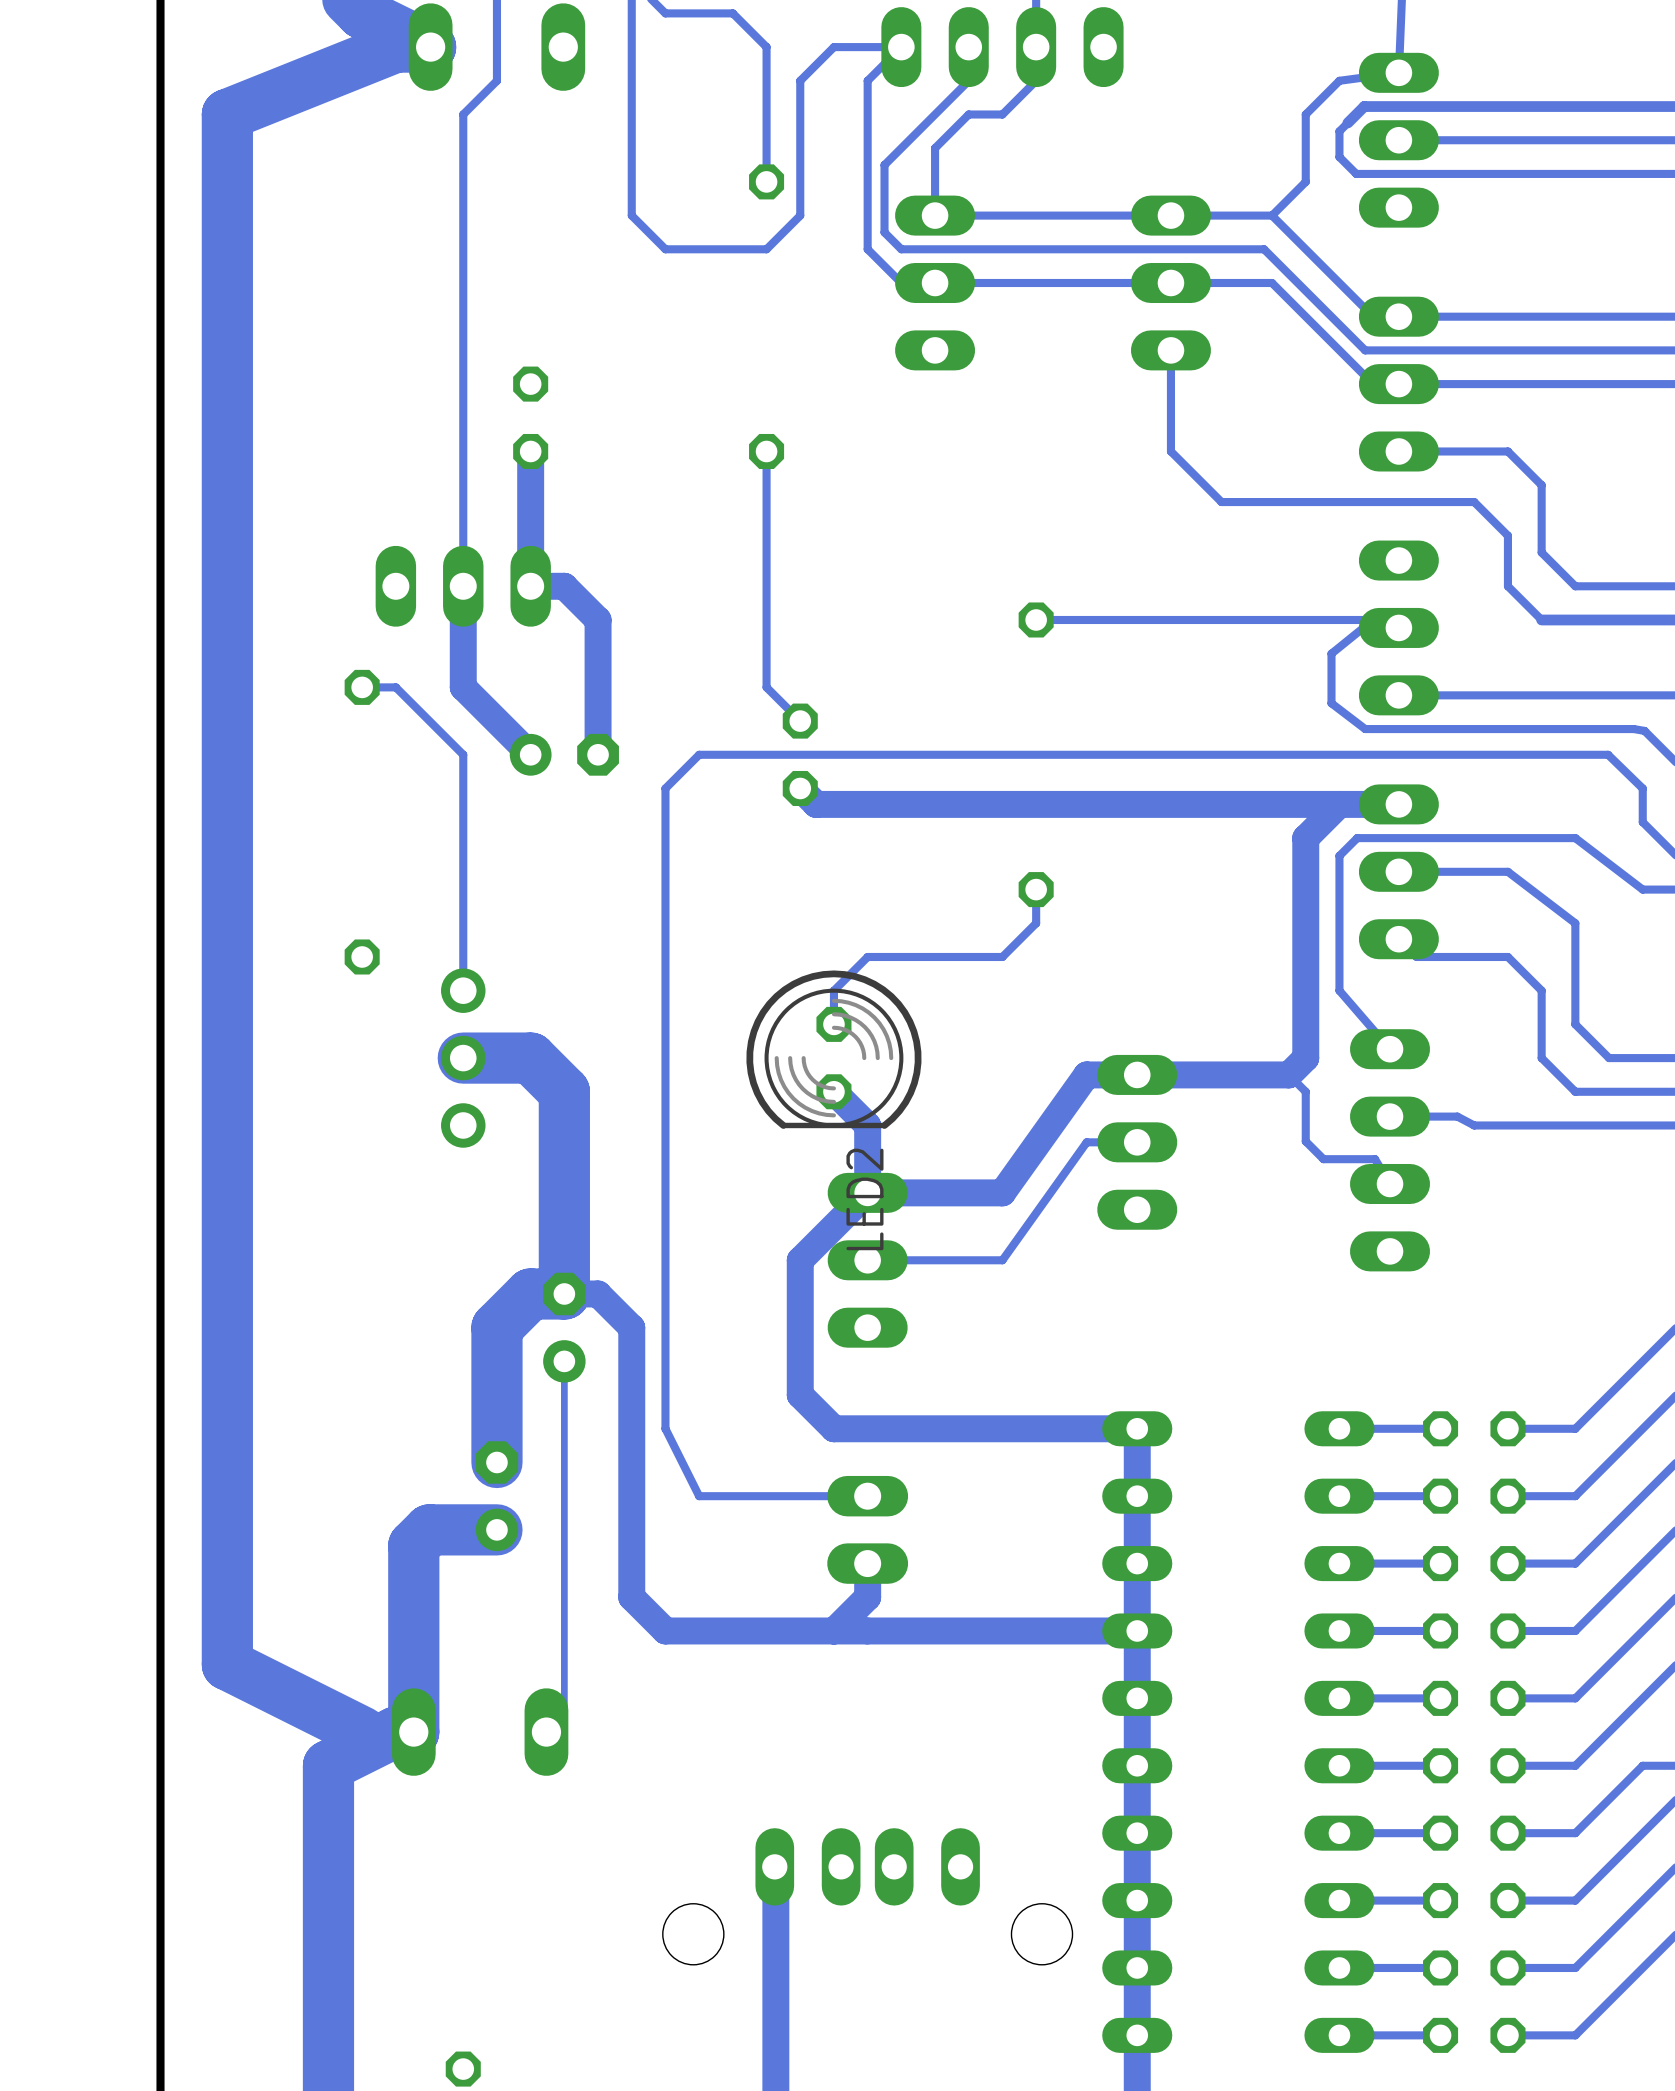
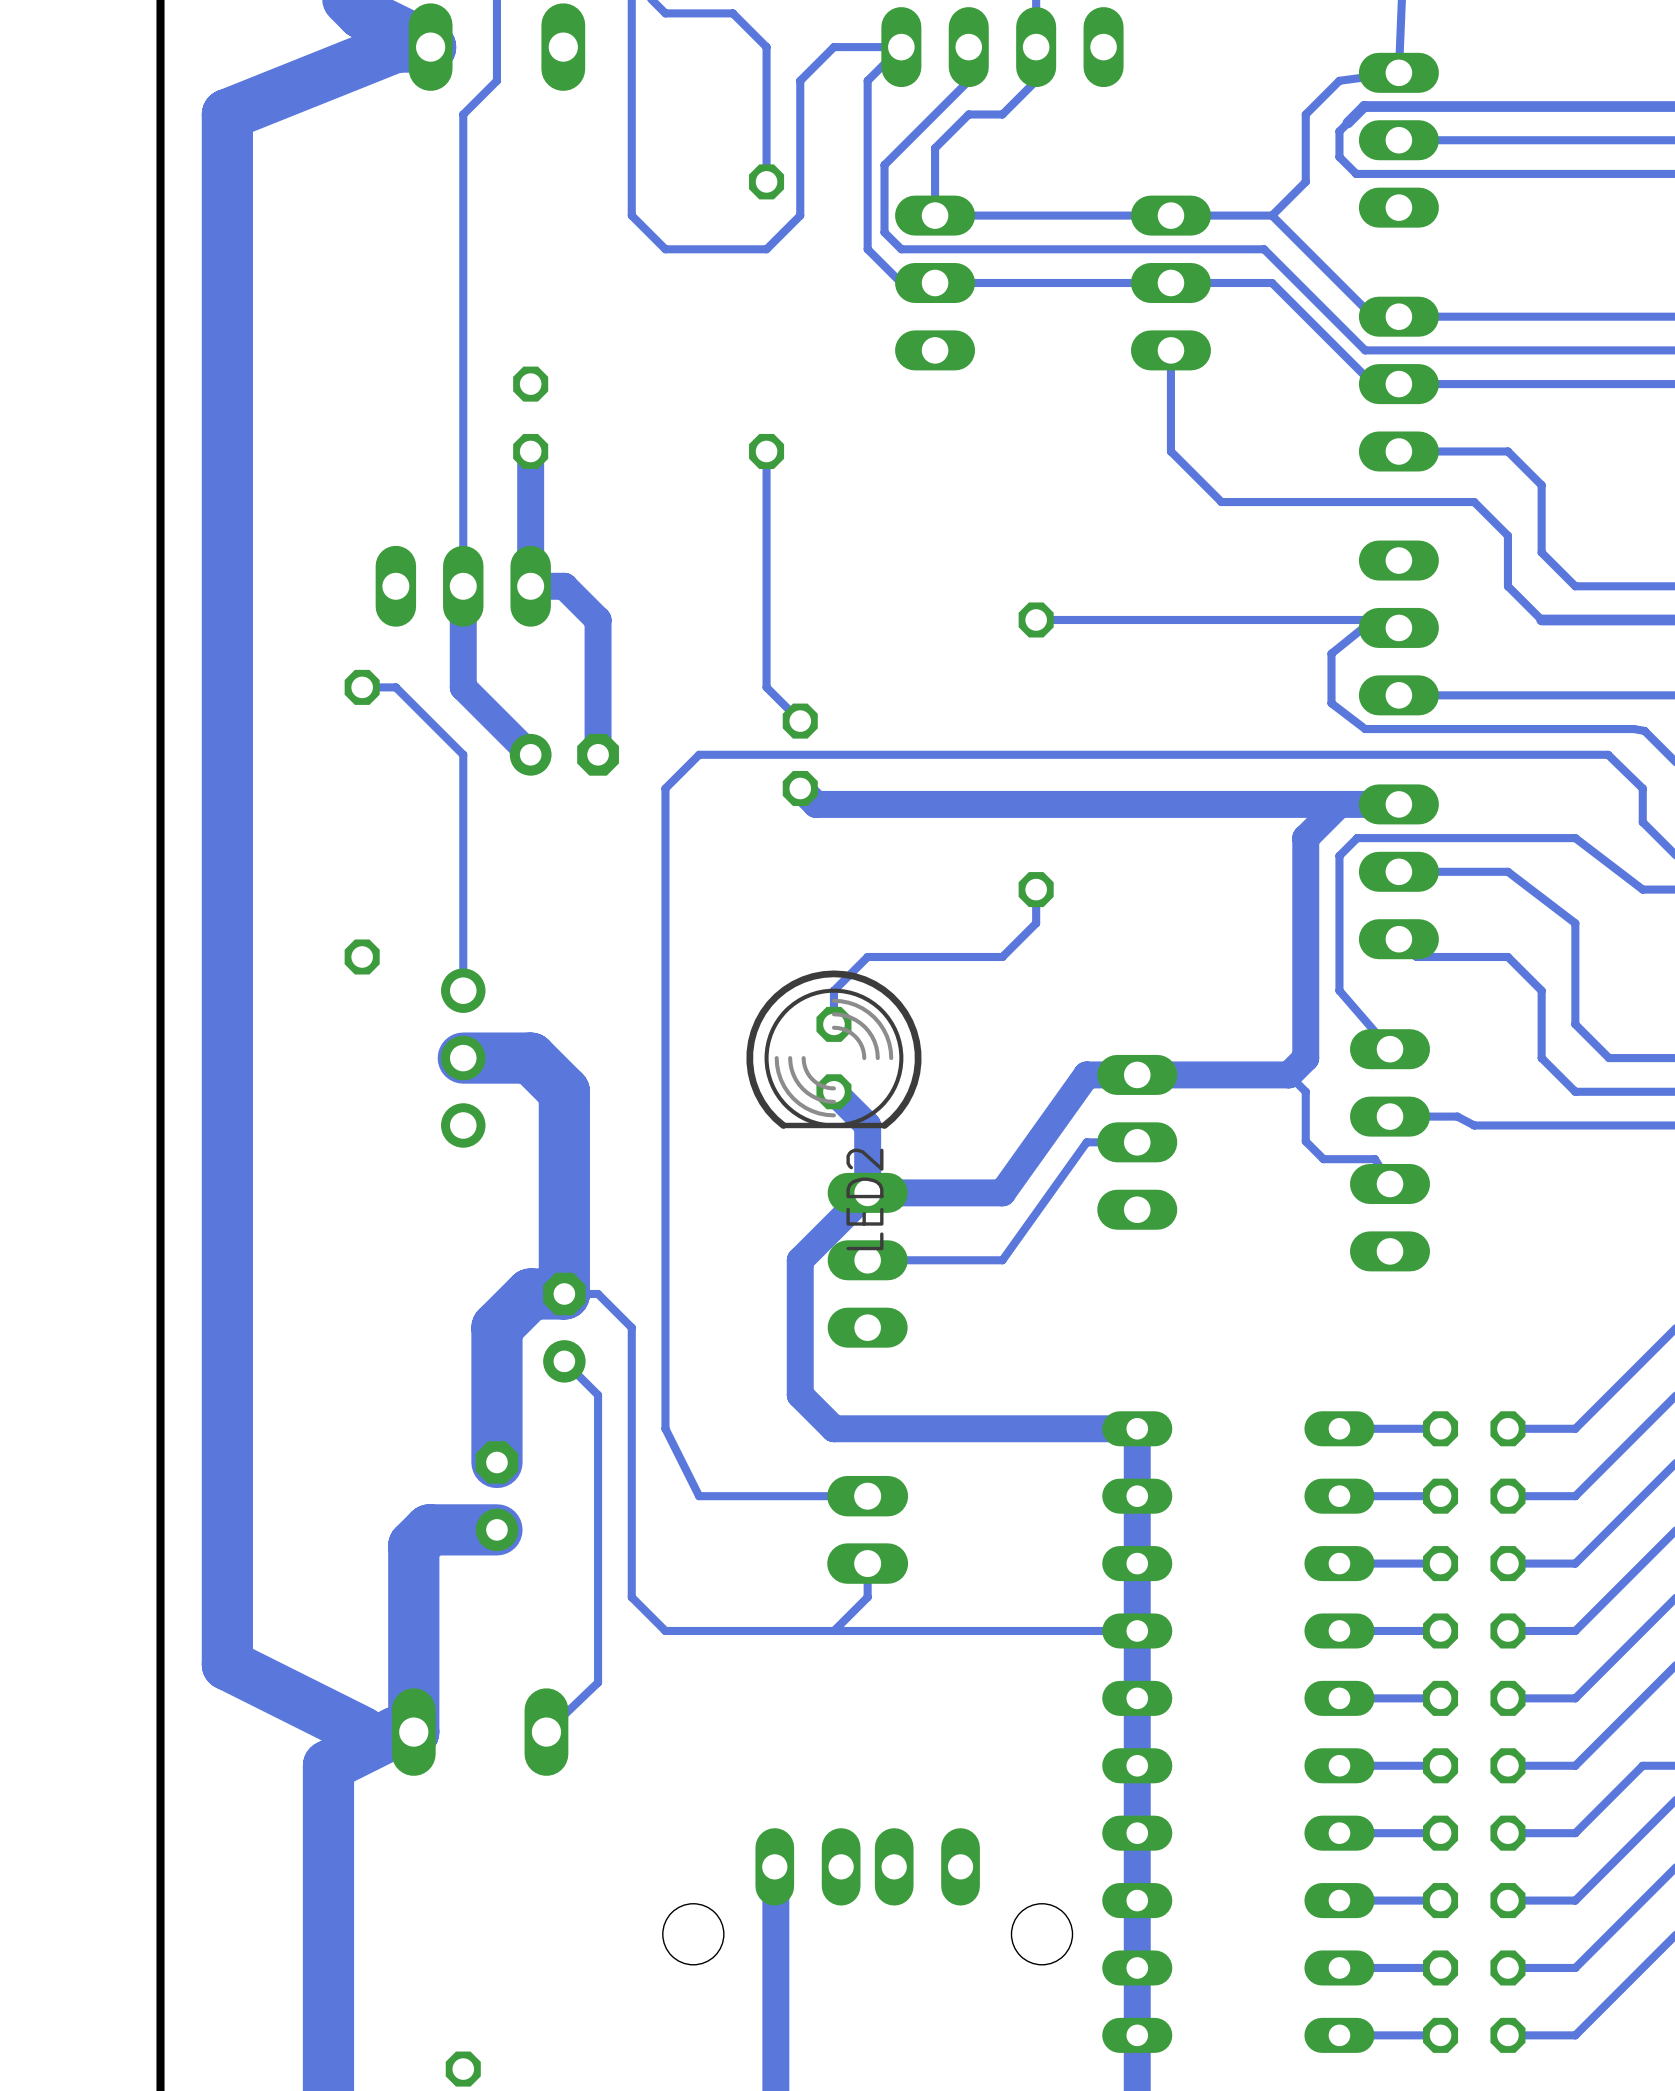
track width: thick (564, 1293) (598, 1293) (631, 1327) (631, 1597) (665, 1630) (866, 1630) -> thin (564, 1293) (598, 1293) (631, 1327) (631, 1597) (665, 1630) (866, 1630)
track: (564, 1361) (564, 1714) (546, 1732) -> (564, 1361) (598, 1395) (598, 1682) (546, 1732)
track width: thick (867, 1563) (867, 1597) (833, 1630) -> thin (867, 1563) (867, 1597) (833, 1630)
track width: thick (1137, 1630) (867, 1630) -> thin (1137, 1630) (867, 1630)

